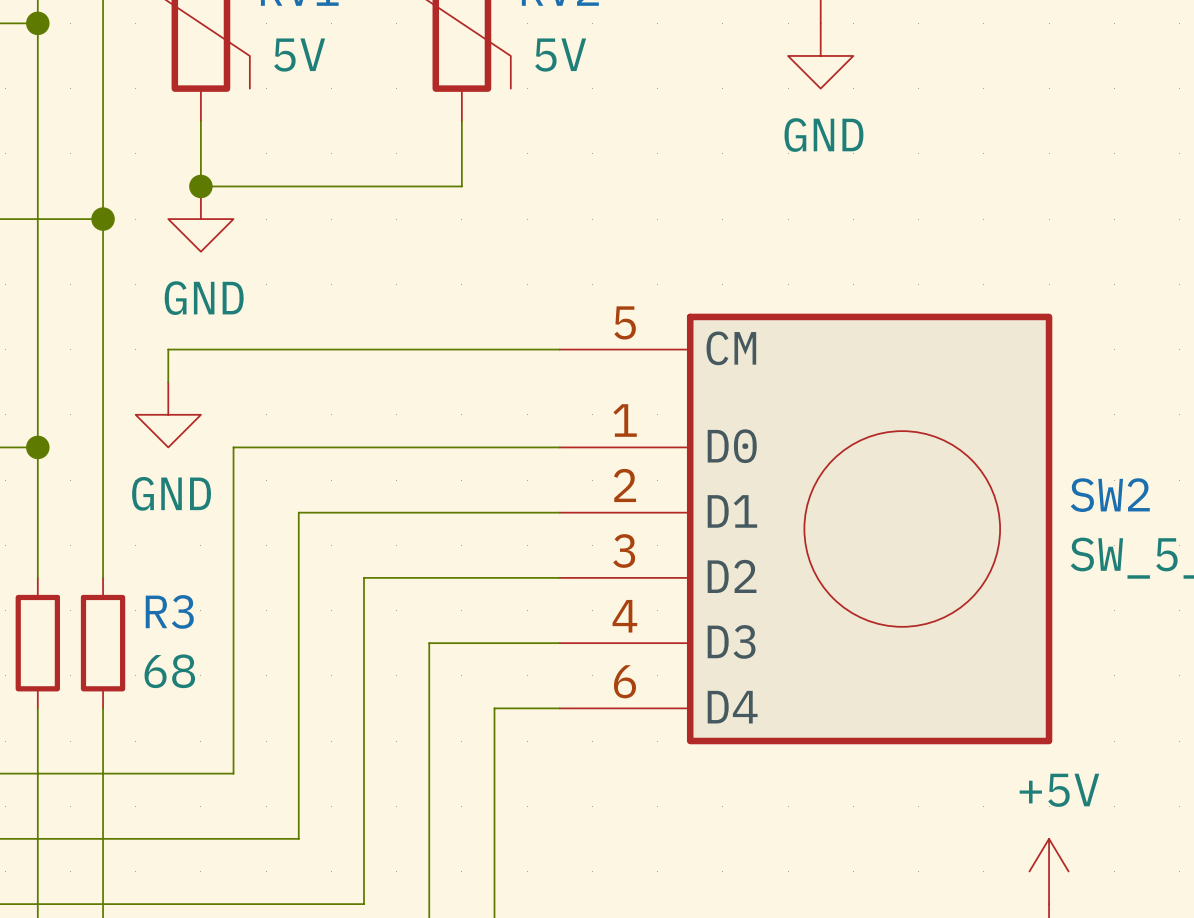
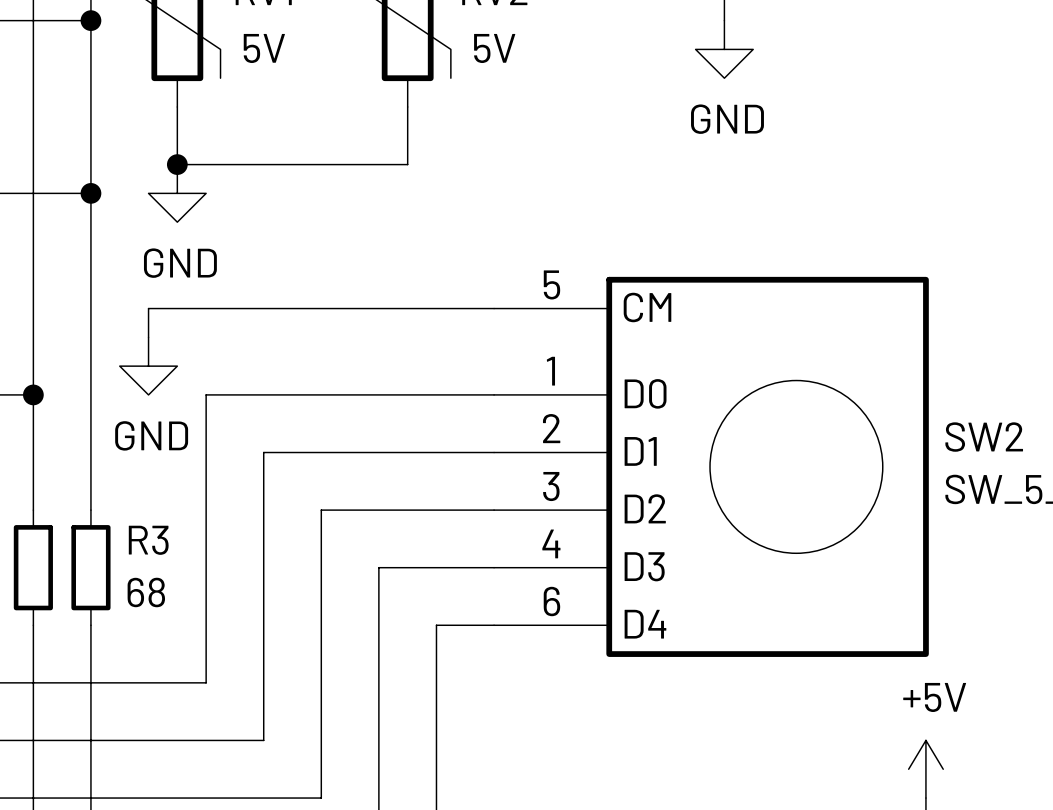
wire: none -> (33, 20) (90, 20)
junction position: (37, 23) -> (90, 20)

